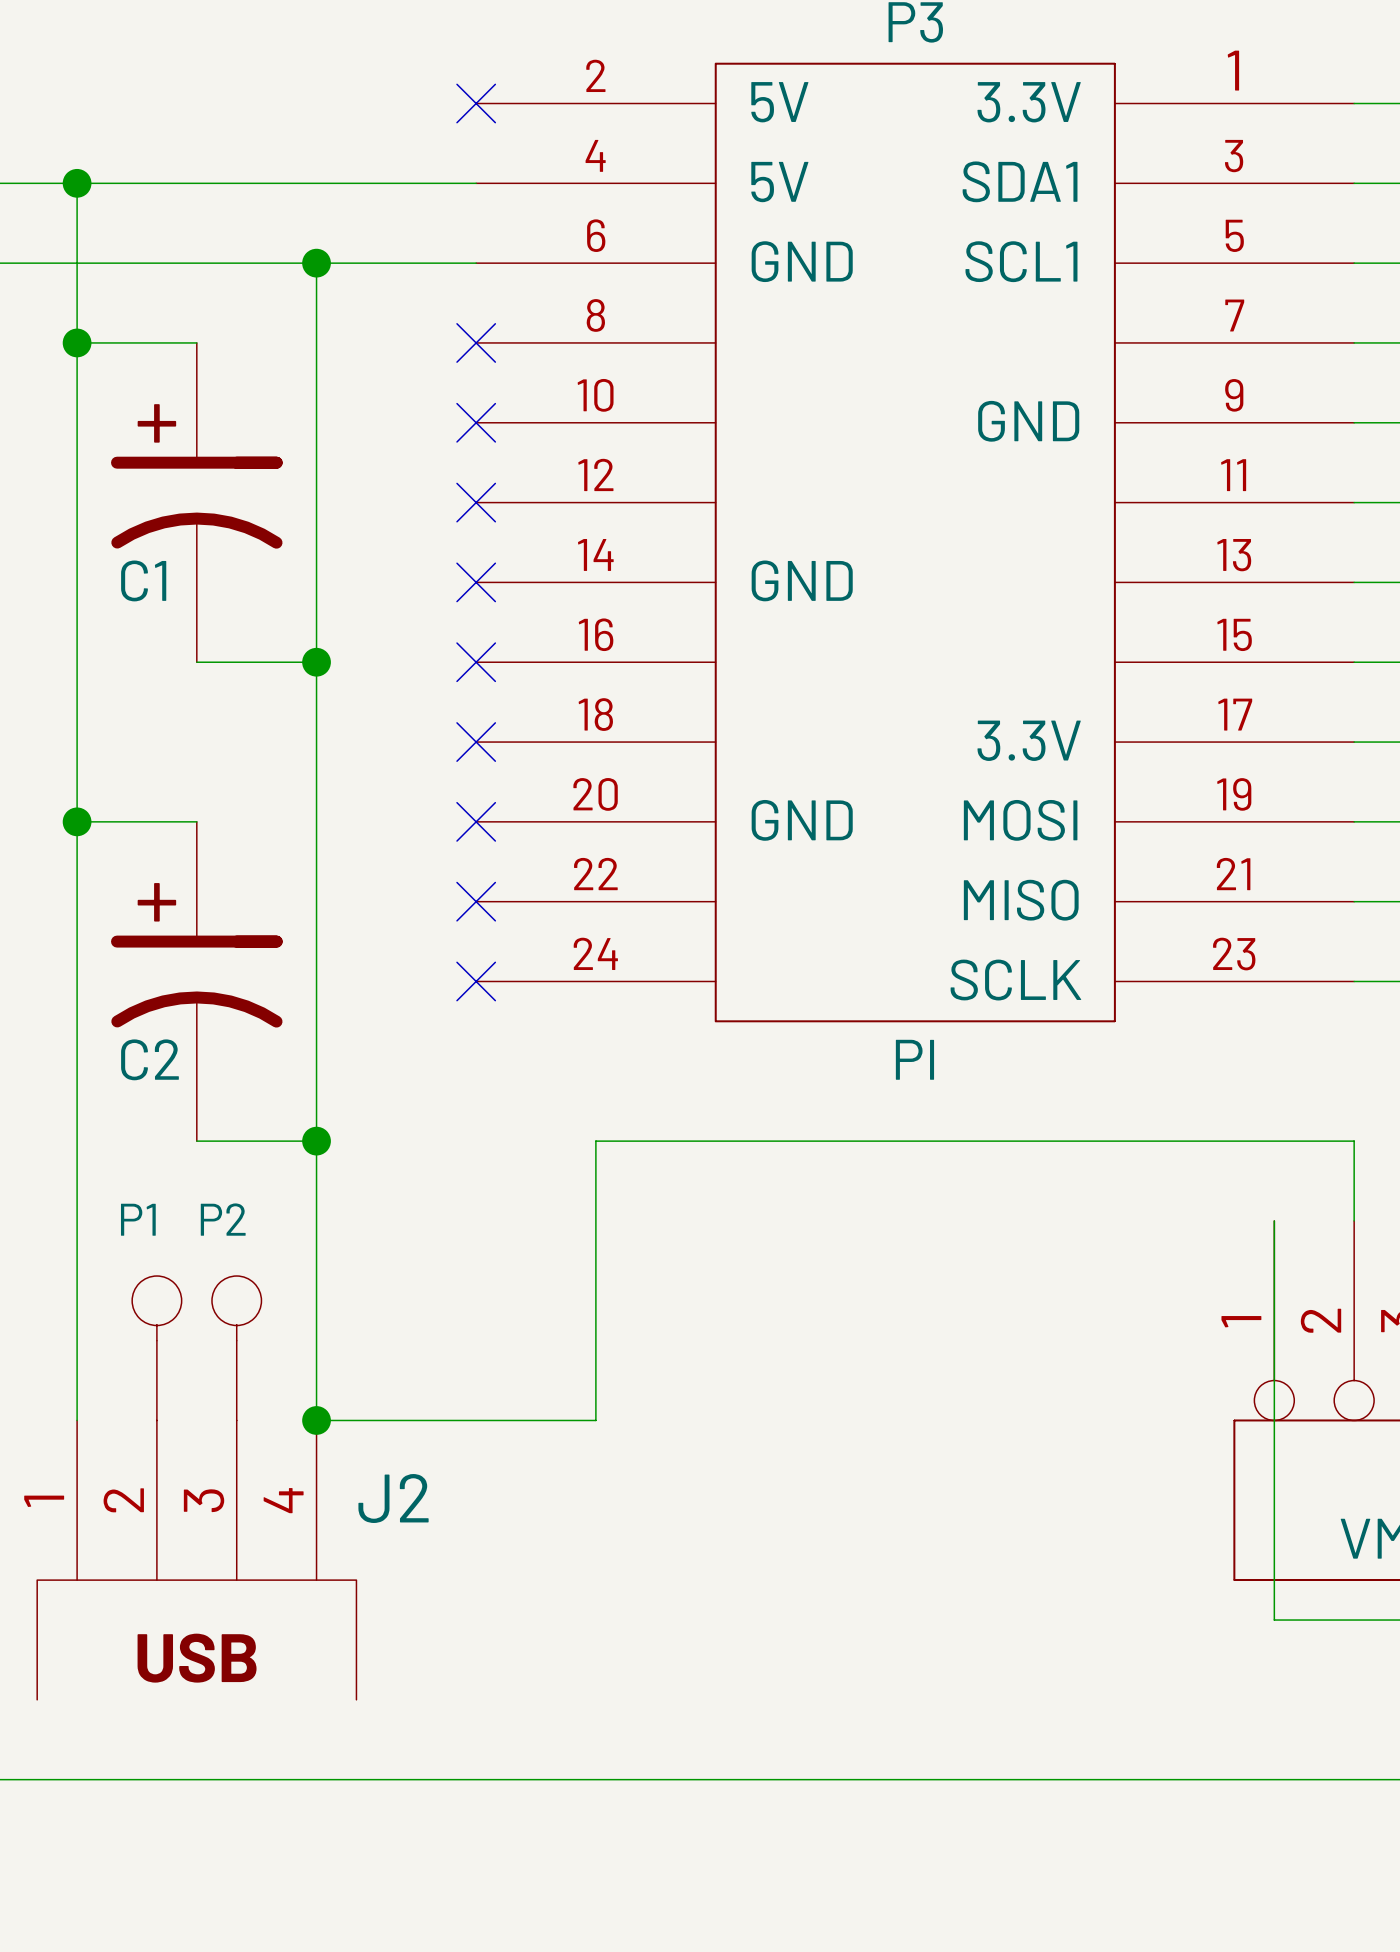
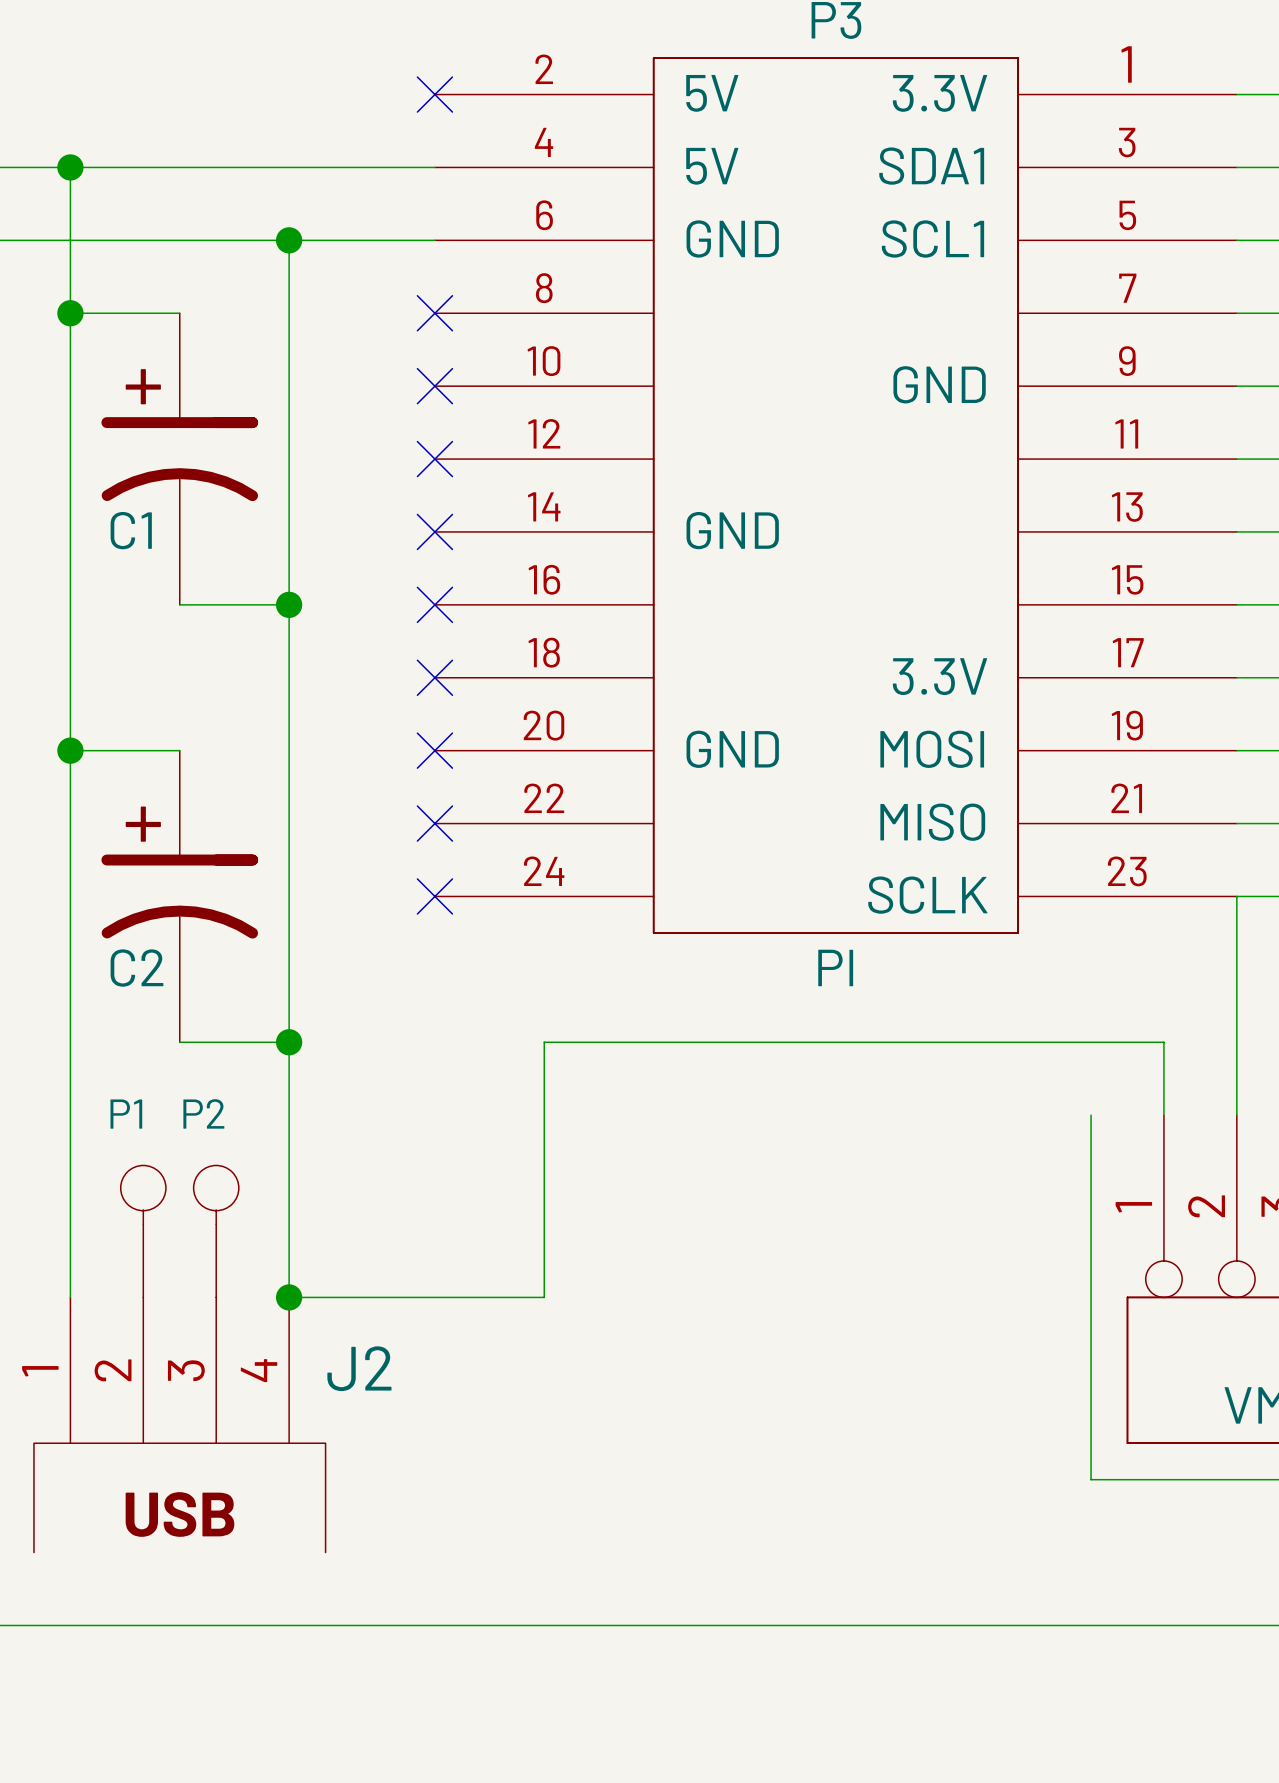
wire: none -> (1236, 896) (1236, 1042)
wire: (1274, 1141) (1354, 1141) -> (1163, 1042) (1163, 1115)
wire: (1274, 1220) (1274, 1620) -> (1091, 1115) (1091, 1479) (1163, 1479)

